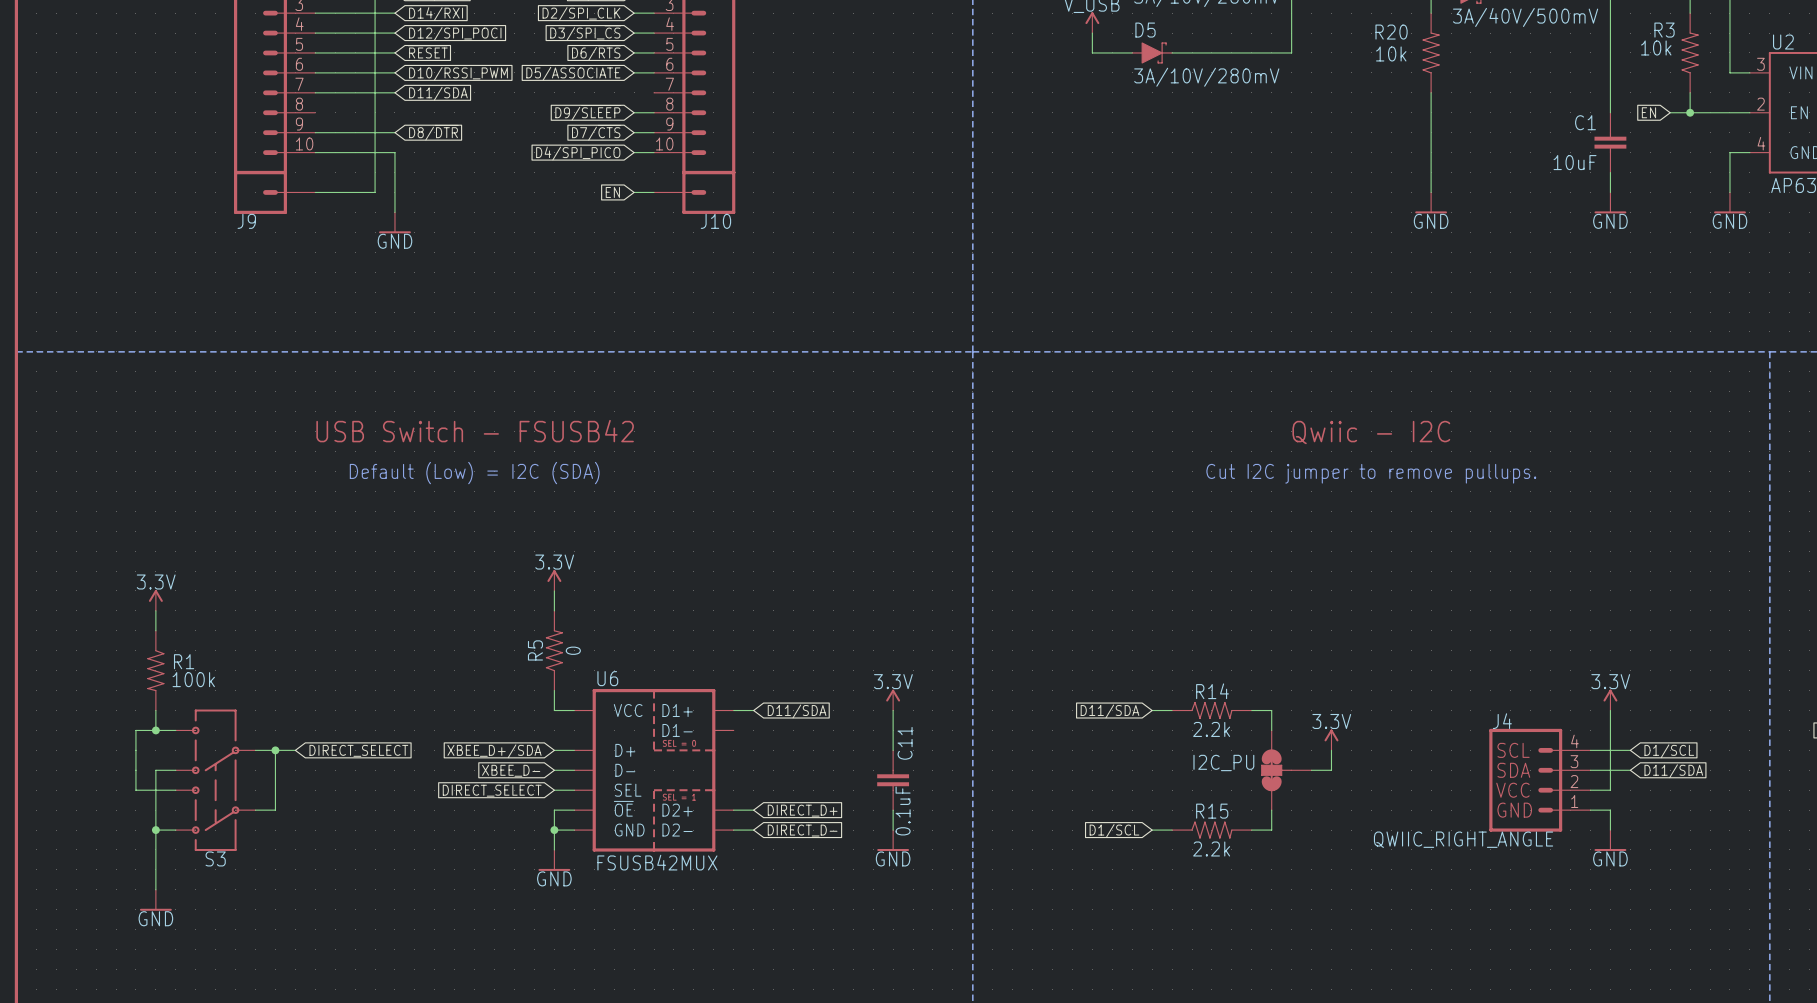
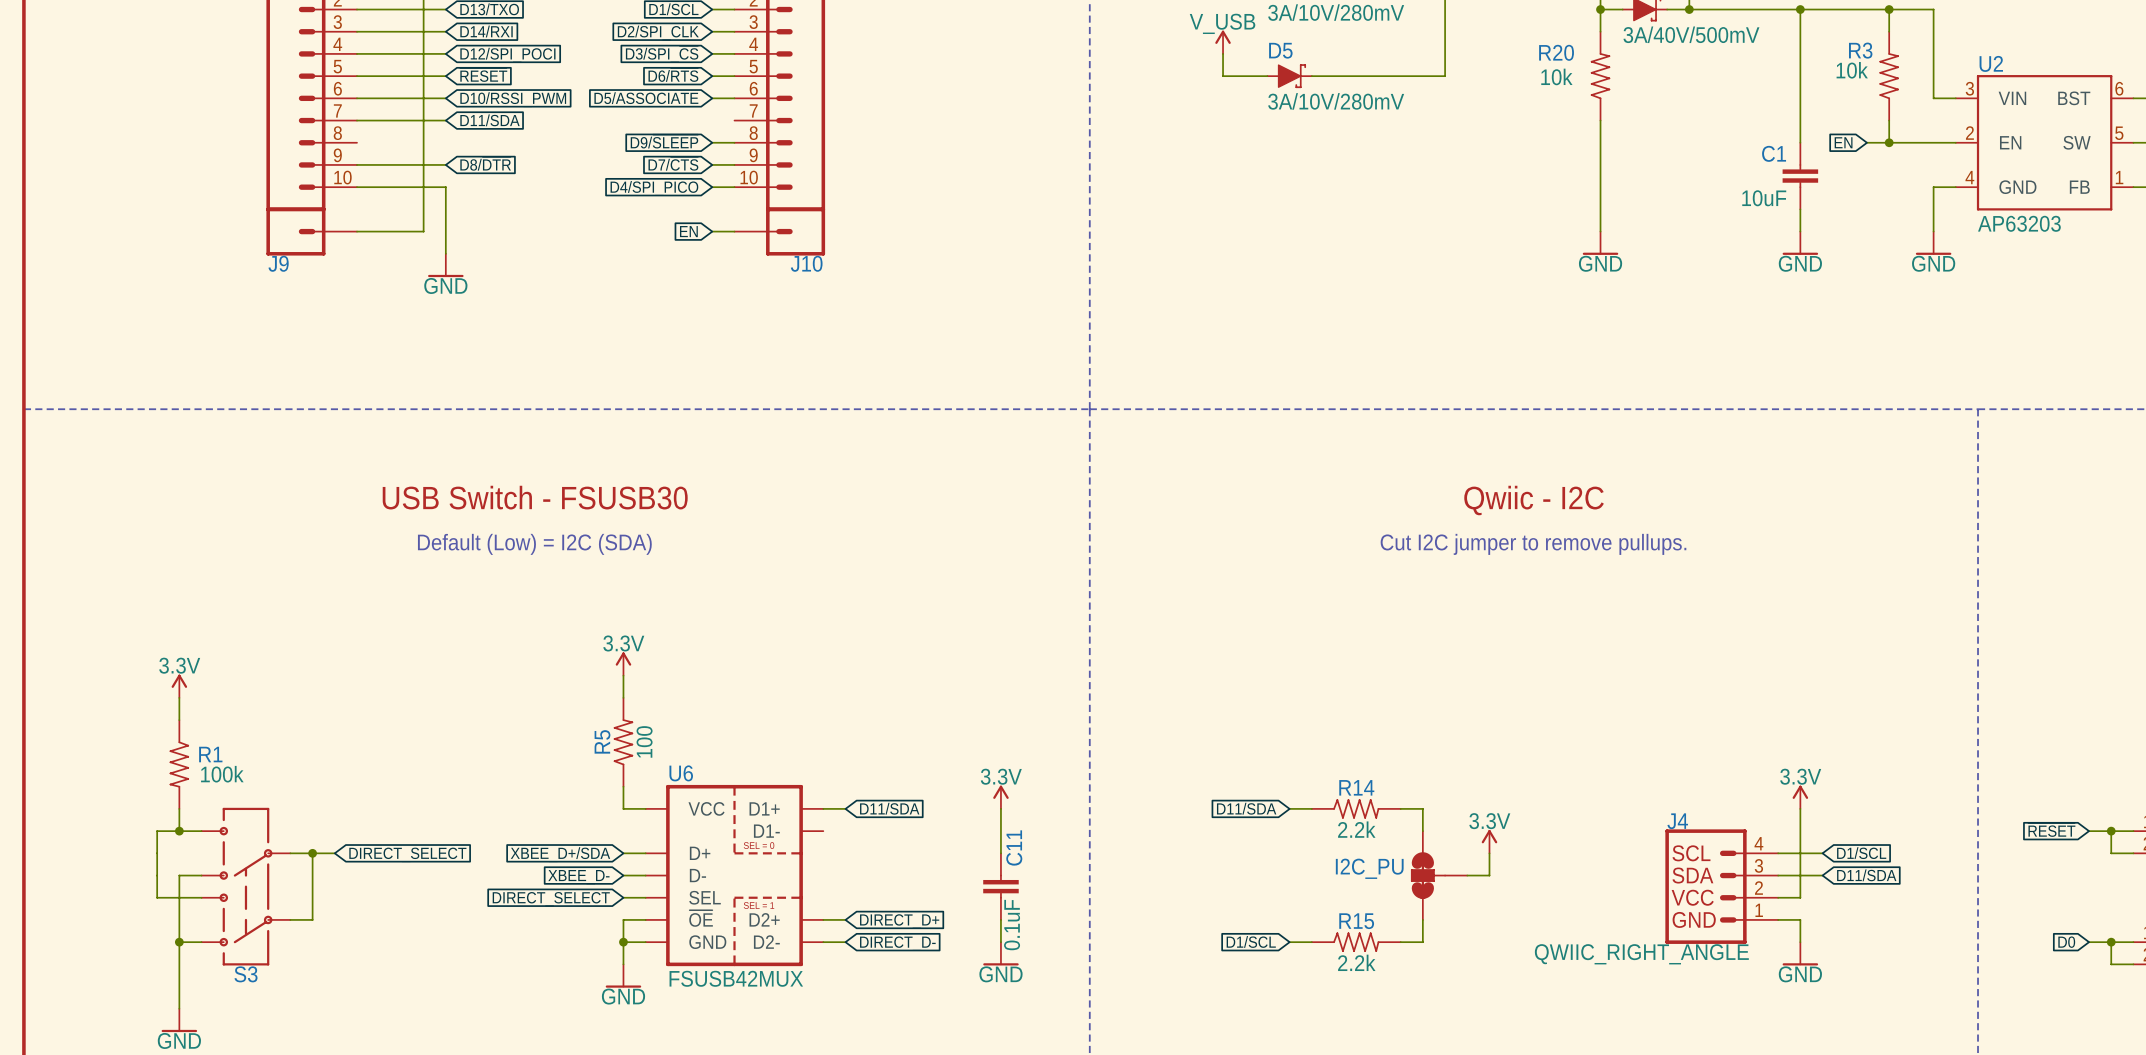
text: USB Switch - FSUSB42 (475, 431) -> USB Switch - FSUSB30 (535, 497)
R5 value: 0 (573, 650) -> 100 (644, 741)

